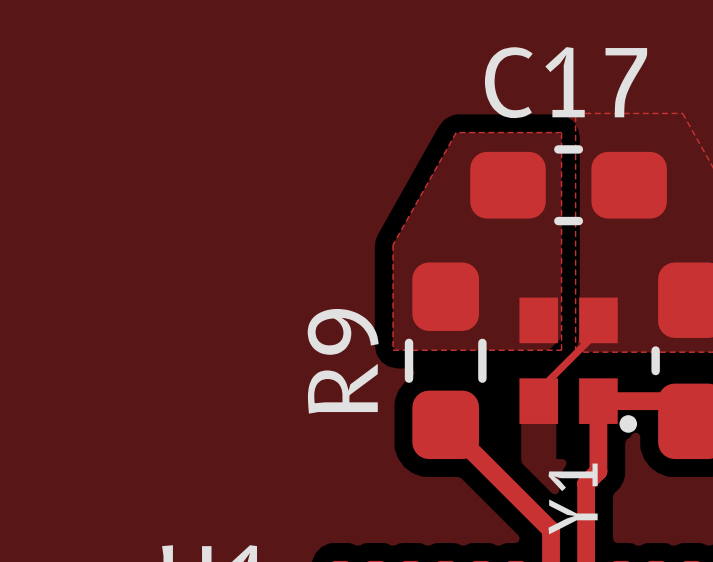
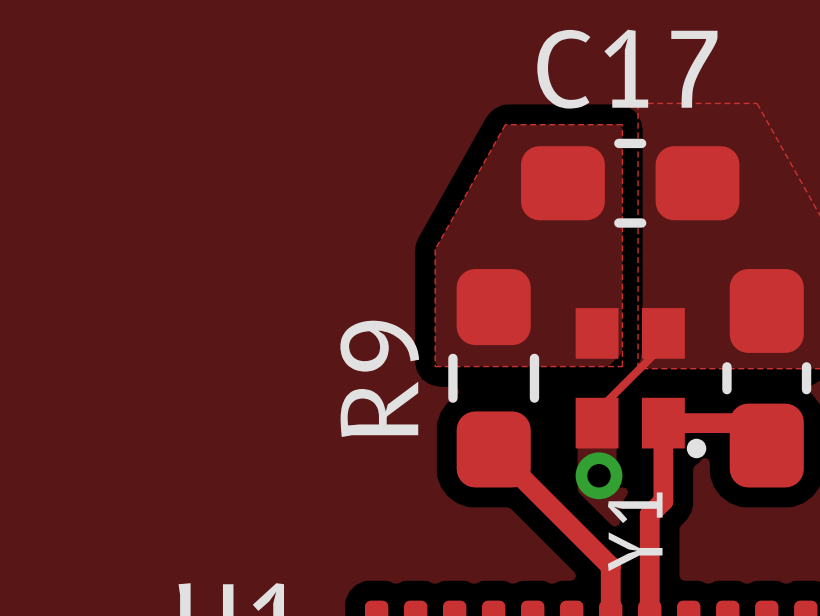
via: none -> (599, 475)

